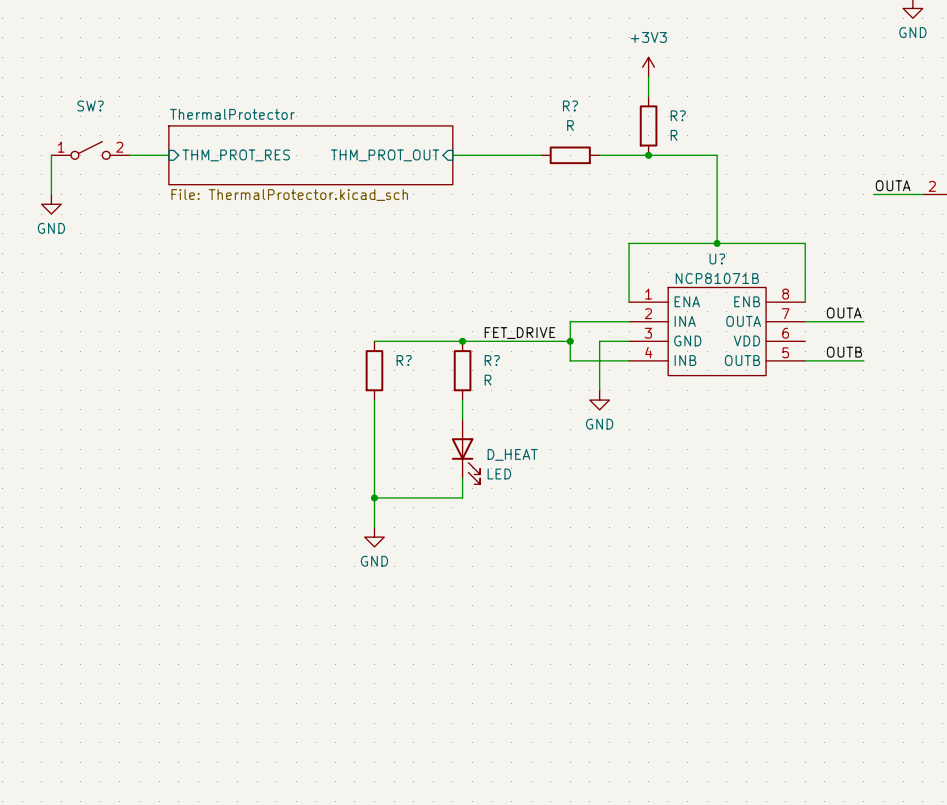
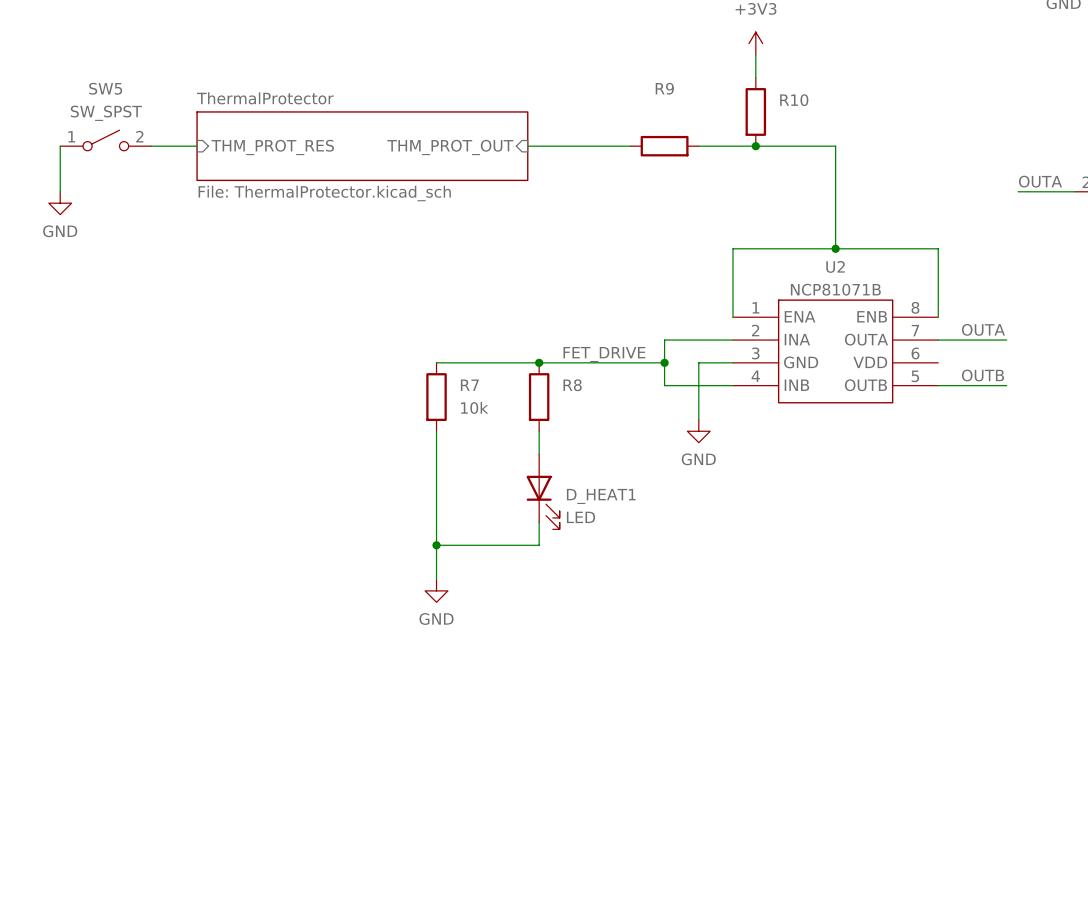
SW? name: SW? (90, 106) -> SW5 (105, 88)
R? name: R? (570, 106) -> R9 (664, 88)
R? name: R? (678, 115) -> R10 (794, 100)
R? value: R (570, 125) -> none
SW? value: none -> SW_SPST (106, 113)
R? value: R (674, 135) -> none
U? name: U? (717, 258) -> U2 (835, 266)
R? name: R? (404, 360) -> R7 (469, 385)
R? name: R? (492, 360) -> R8 (572, 385)
R? value: none -> 10k (474, 407)
R? value: R (488, 380) -> none
D_HEAT name: D_HEAT (512, 454) -> D_HEAT1 (601, 496)

